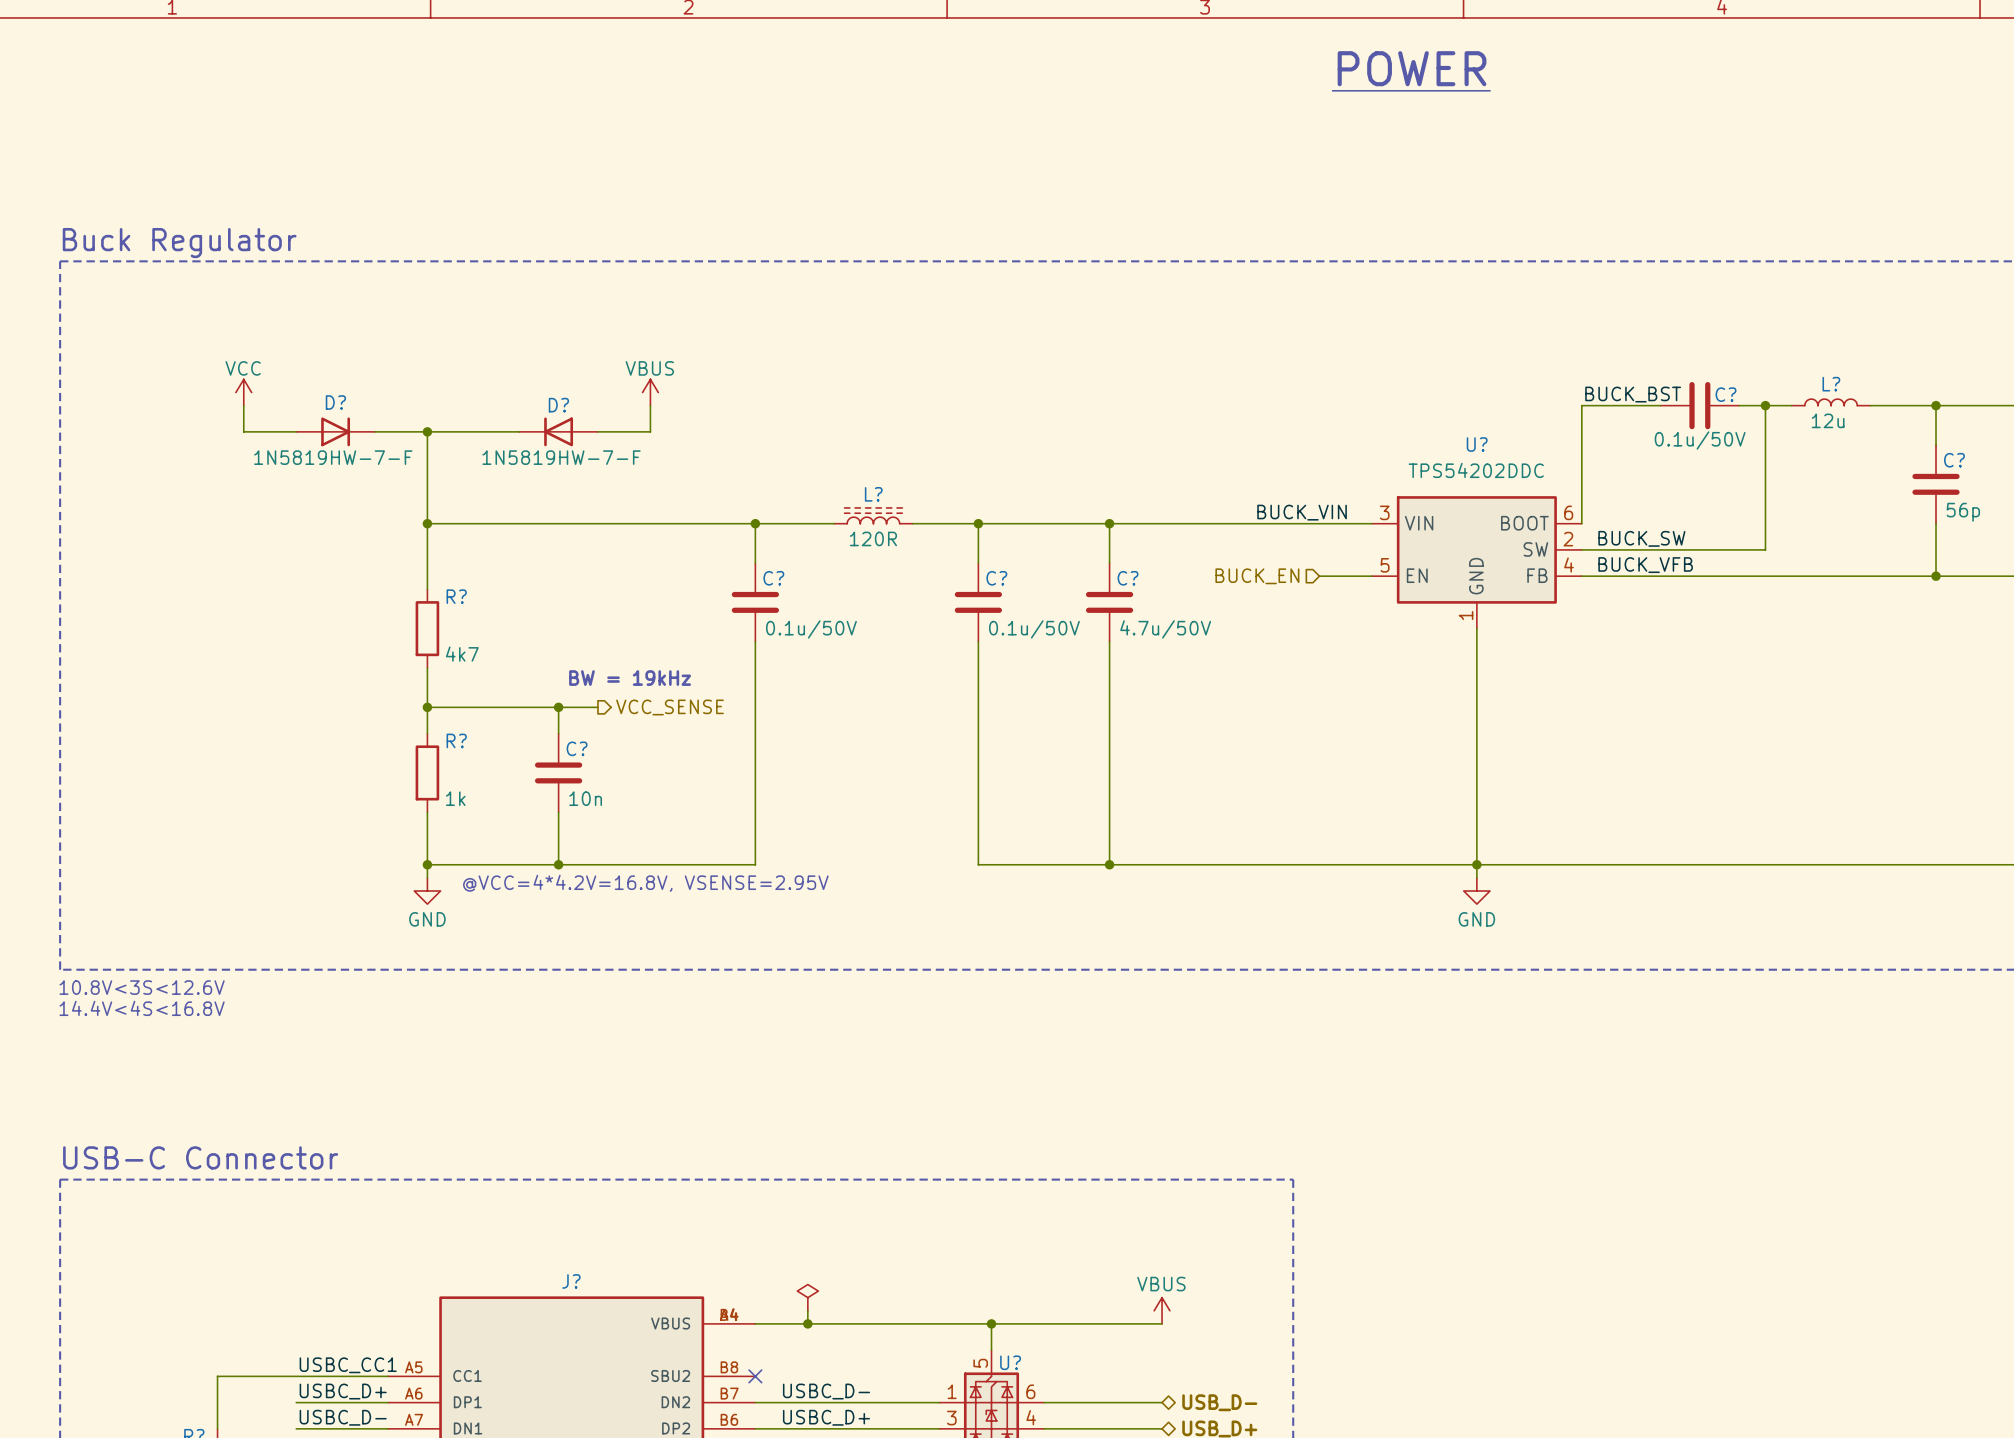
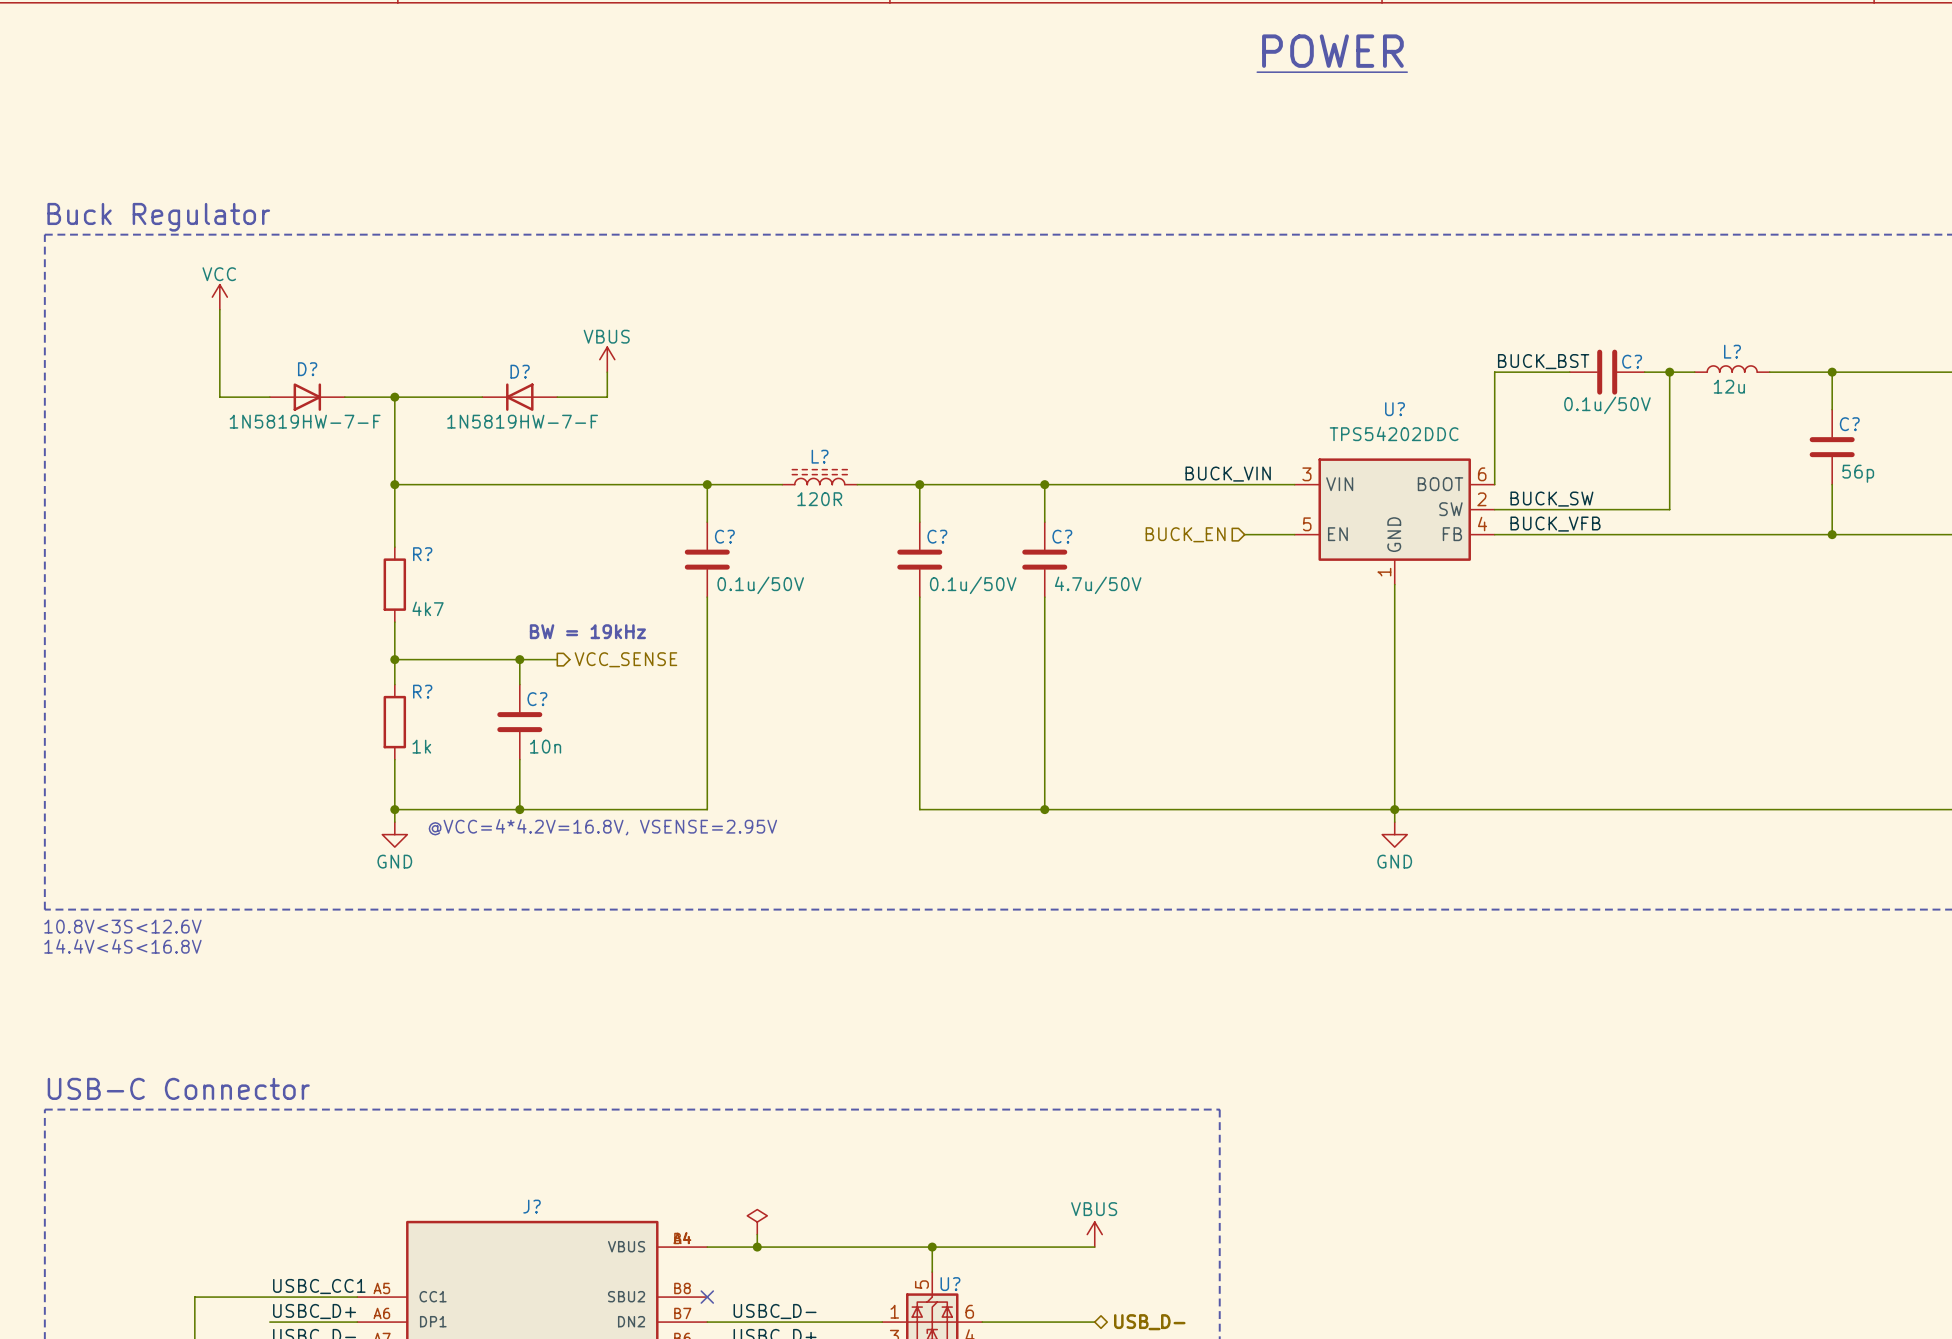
wire: none -> (219, 309) (219, 372)
power symbol position: VCC (243, 392) -> VCC (219, 297)

